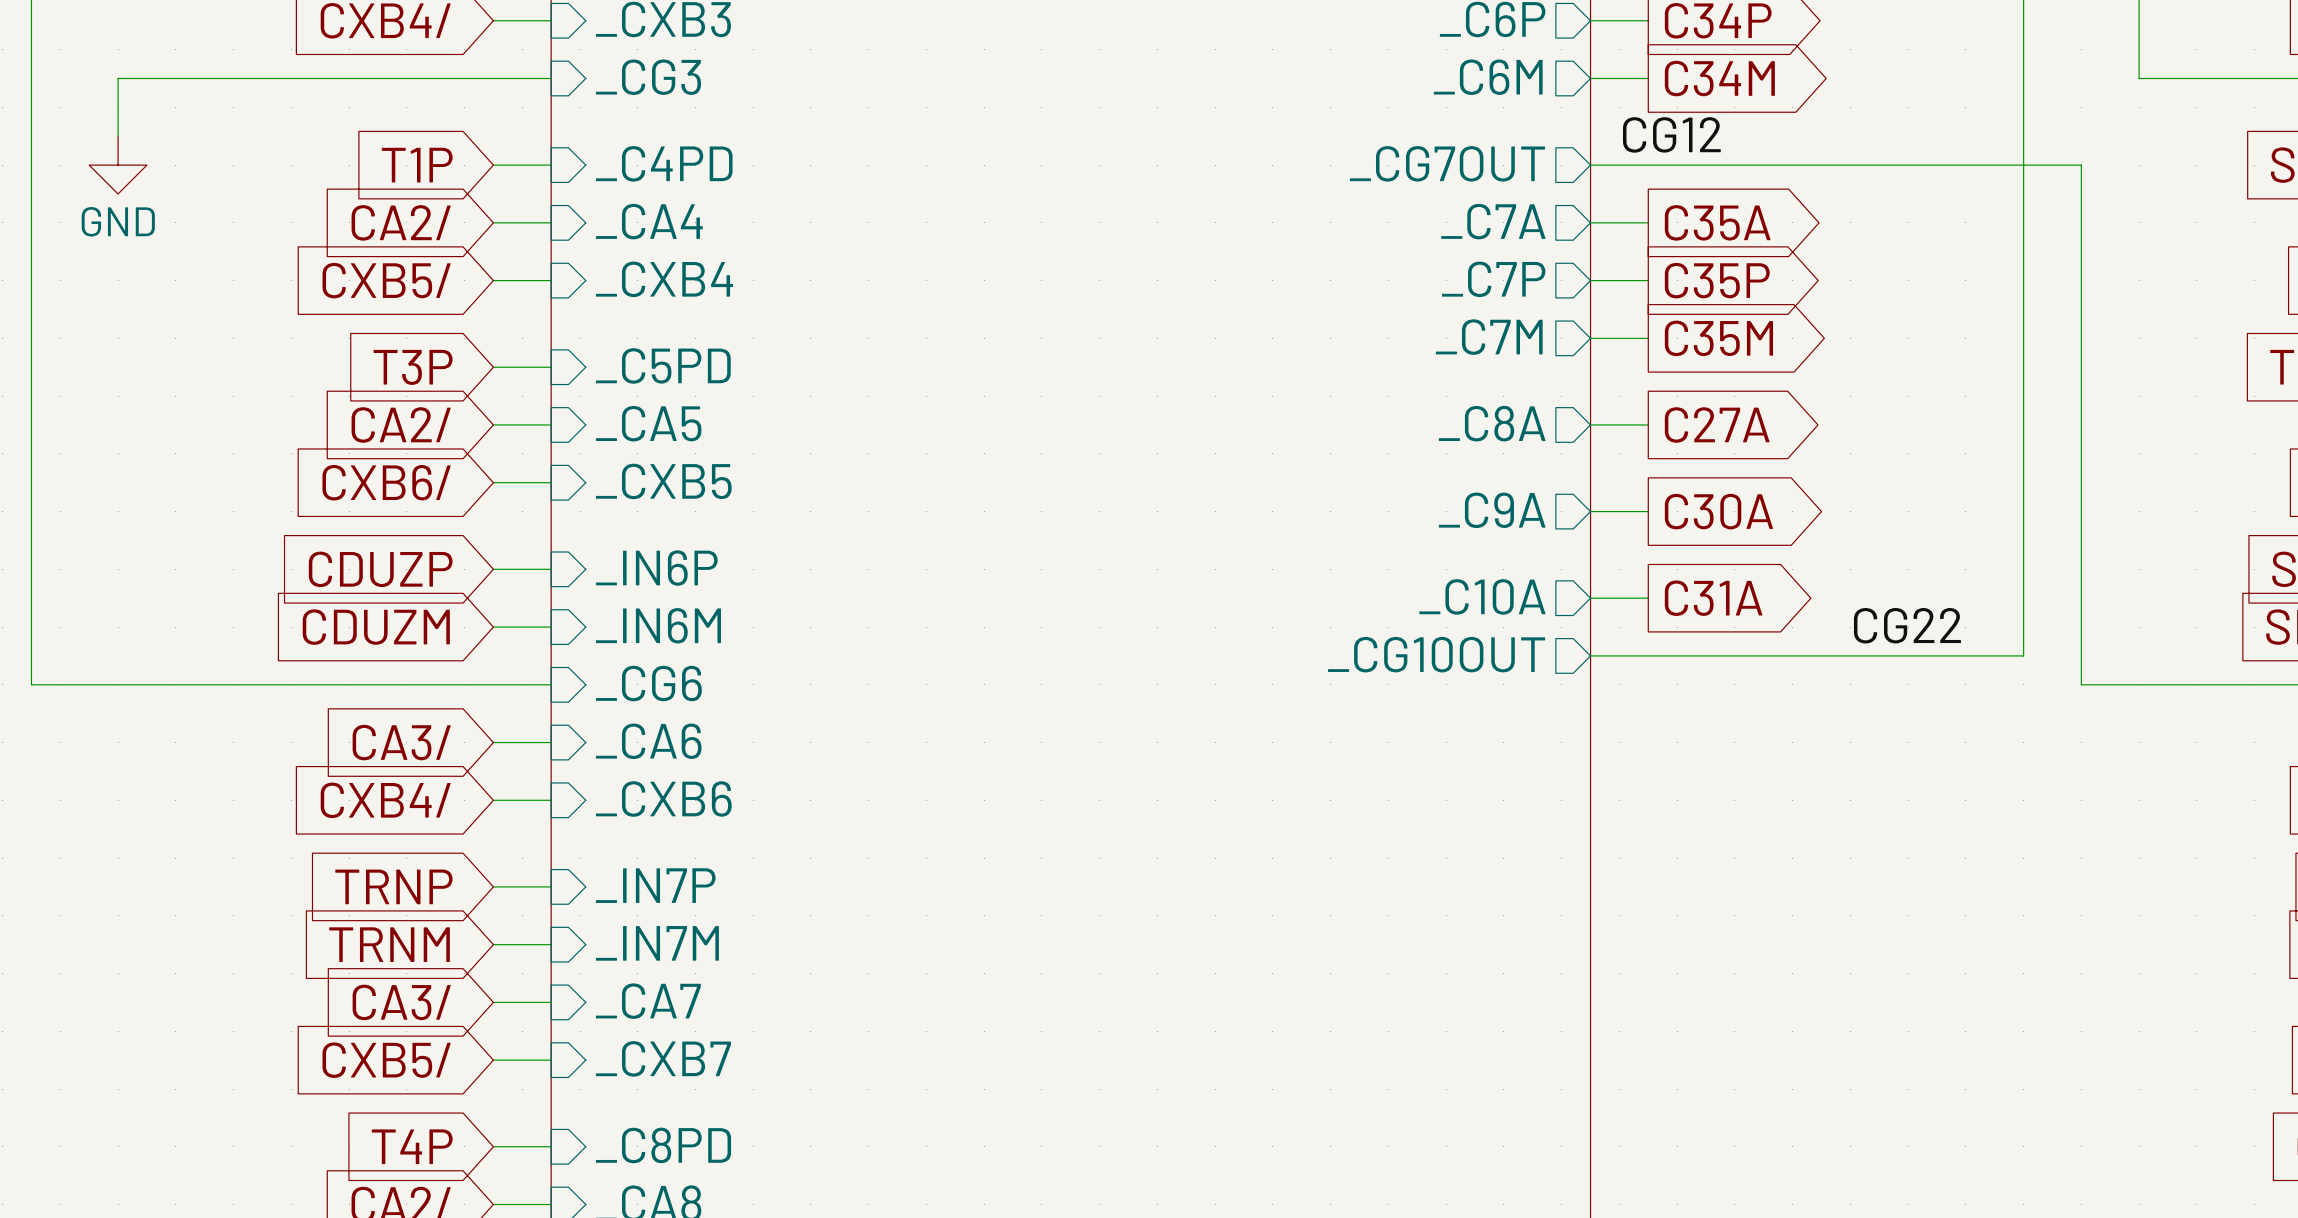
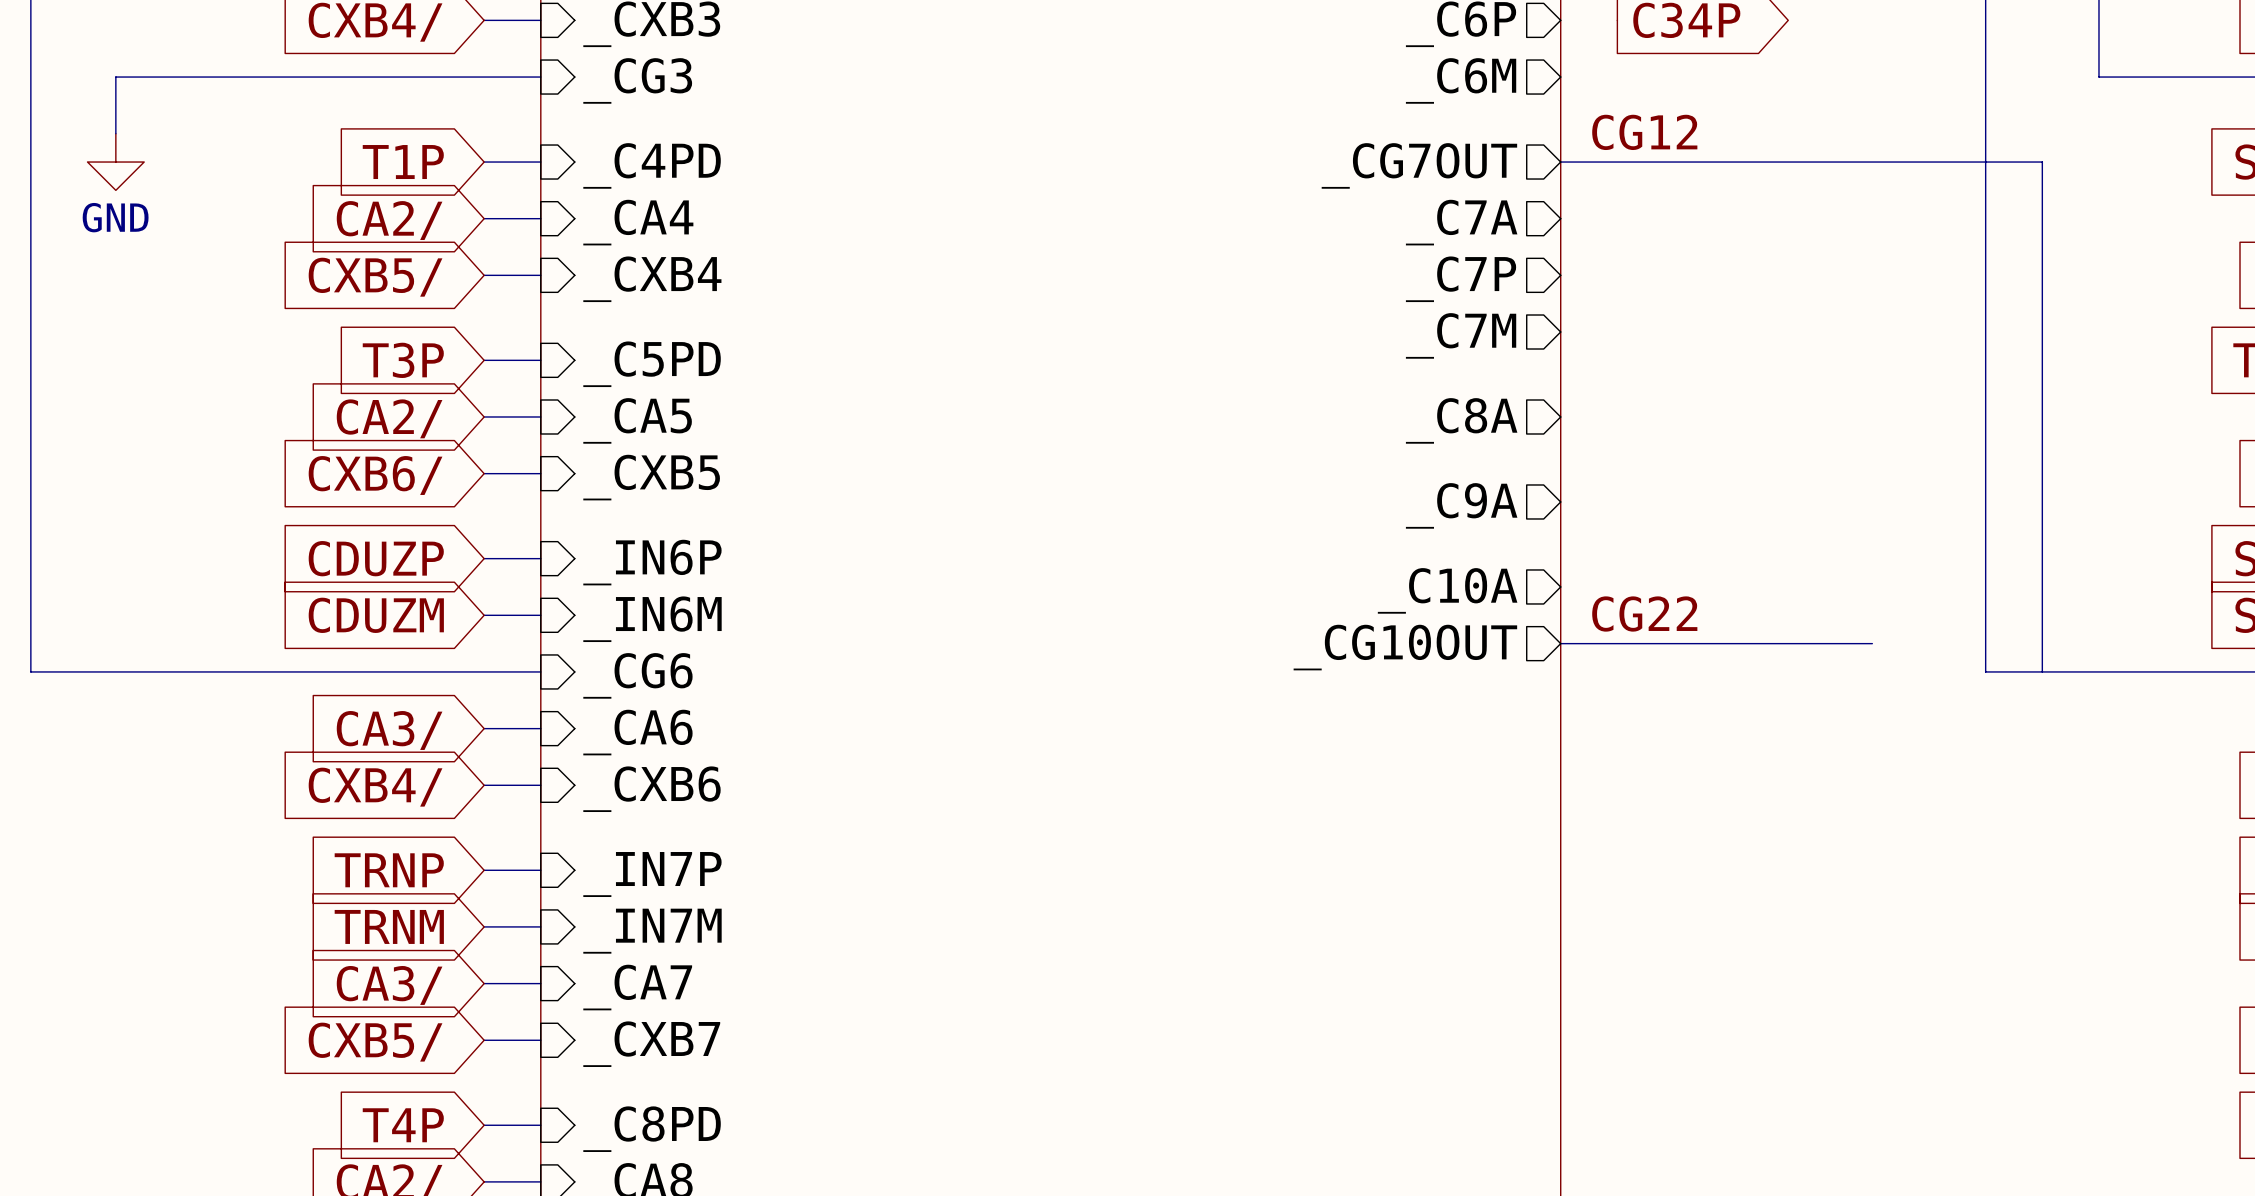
wire: (1590, 20) (1648, 20) -> none
wire: (1590, 78) (1648, 78) -> none
global label: C34M (1719, 78) -> none
wire: (1590, 222) (1648, 222) -> none
global label: C35A (1717, 222) -> none
wire: (1590, 280) (1648, 280) -> none
global label: C35P (1717, 280) -> none
wire: (1590, 338) (1648, 338) -> none
global label: C35M (1718, 338) -> none
wire: (1590, 424) (1648, 424) -> none
global label: C27A (1717, 424) -> none
wire: (1590, 511) (1648, 511) -> none
global label: C30A (1718, 511) -> none
wire: (1590, 598) (1648, 598) -> none
global label: C31A (1713, 598) -> none
label position: CG22 (1907, 625) -> CG22 (1644, 614)
wire: (1908, 655) (2023, 655) -> (2042, 671) (1985, 671) (1985, 643)

